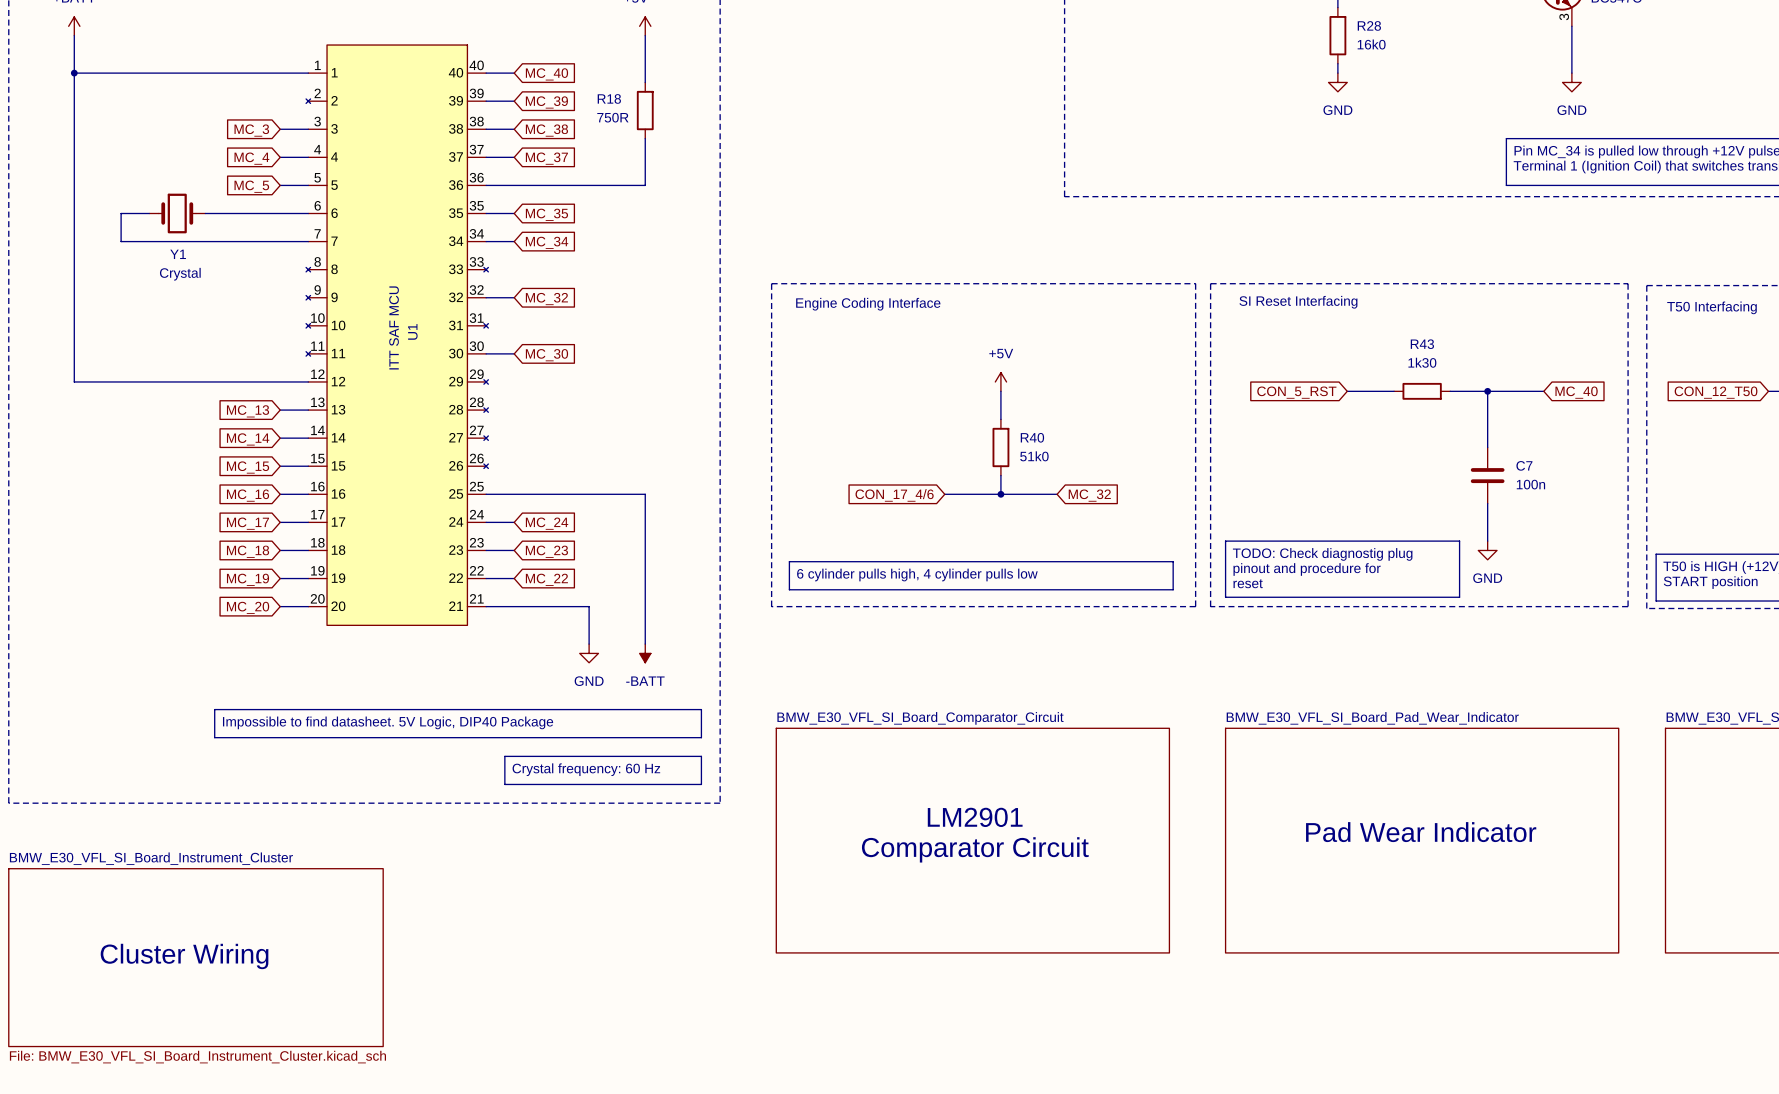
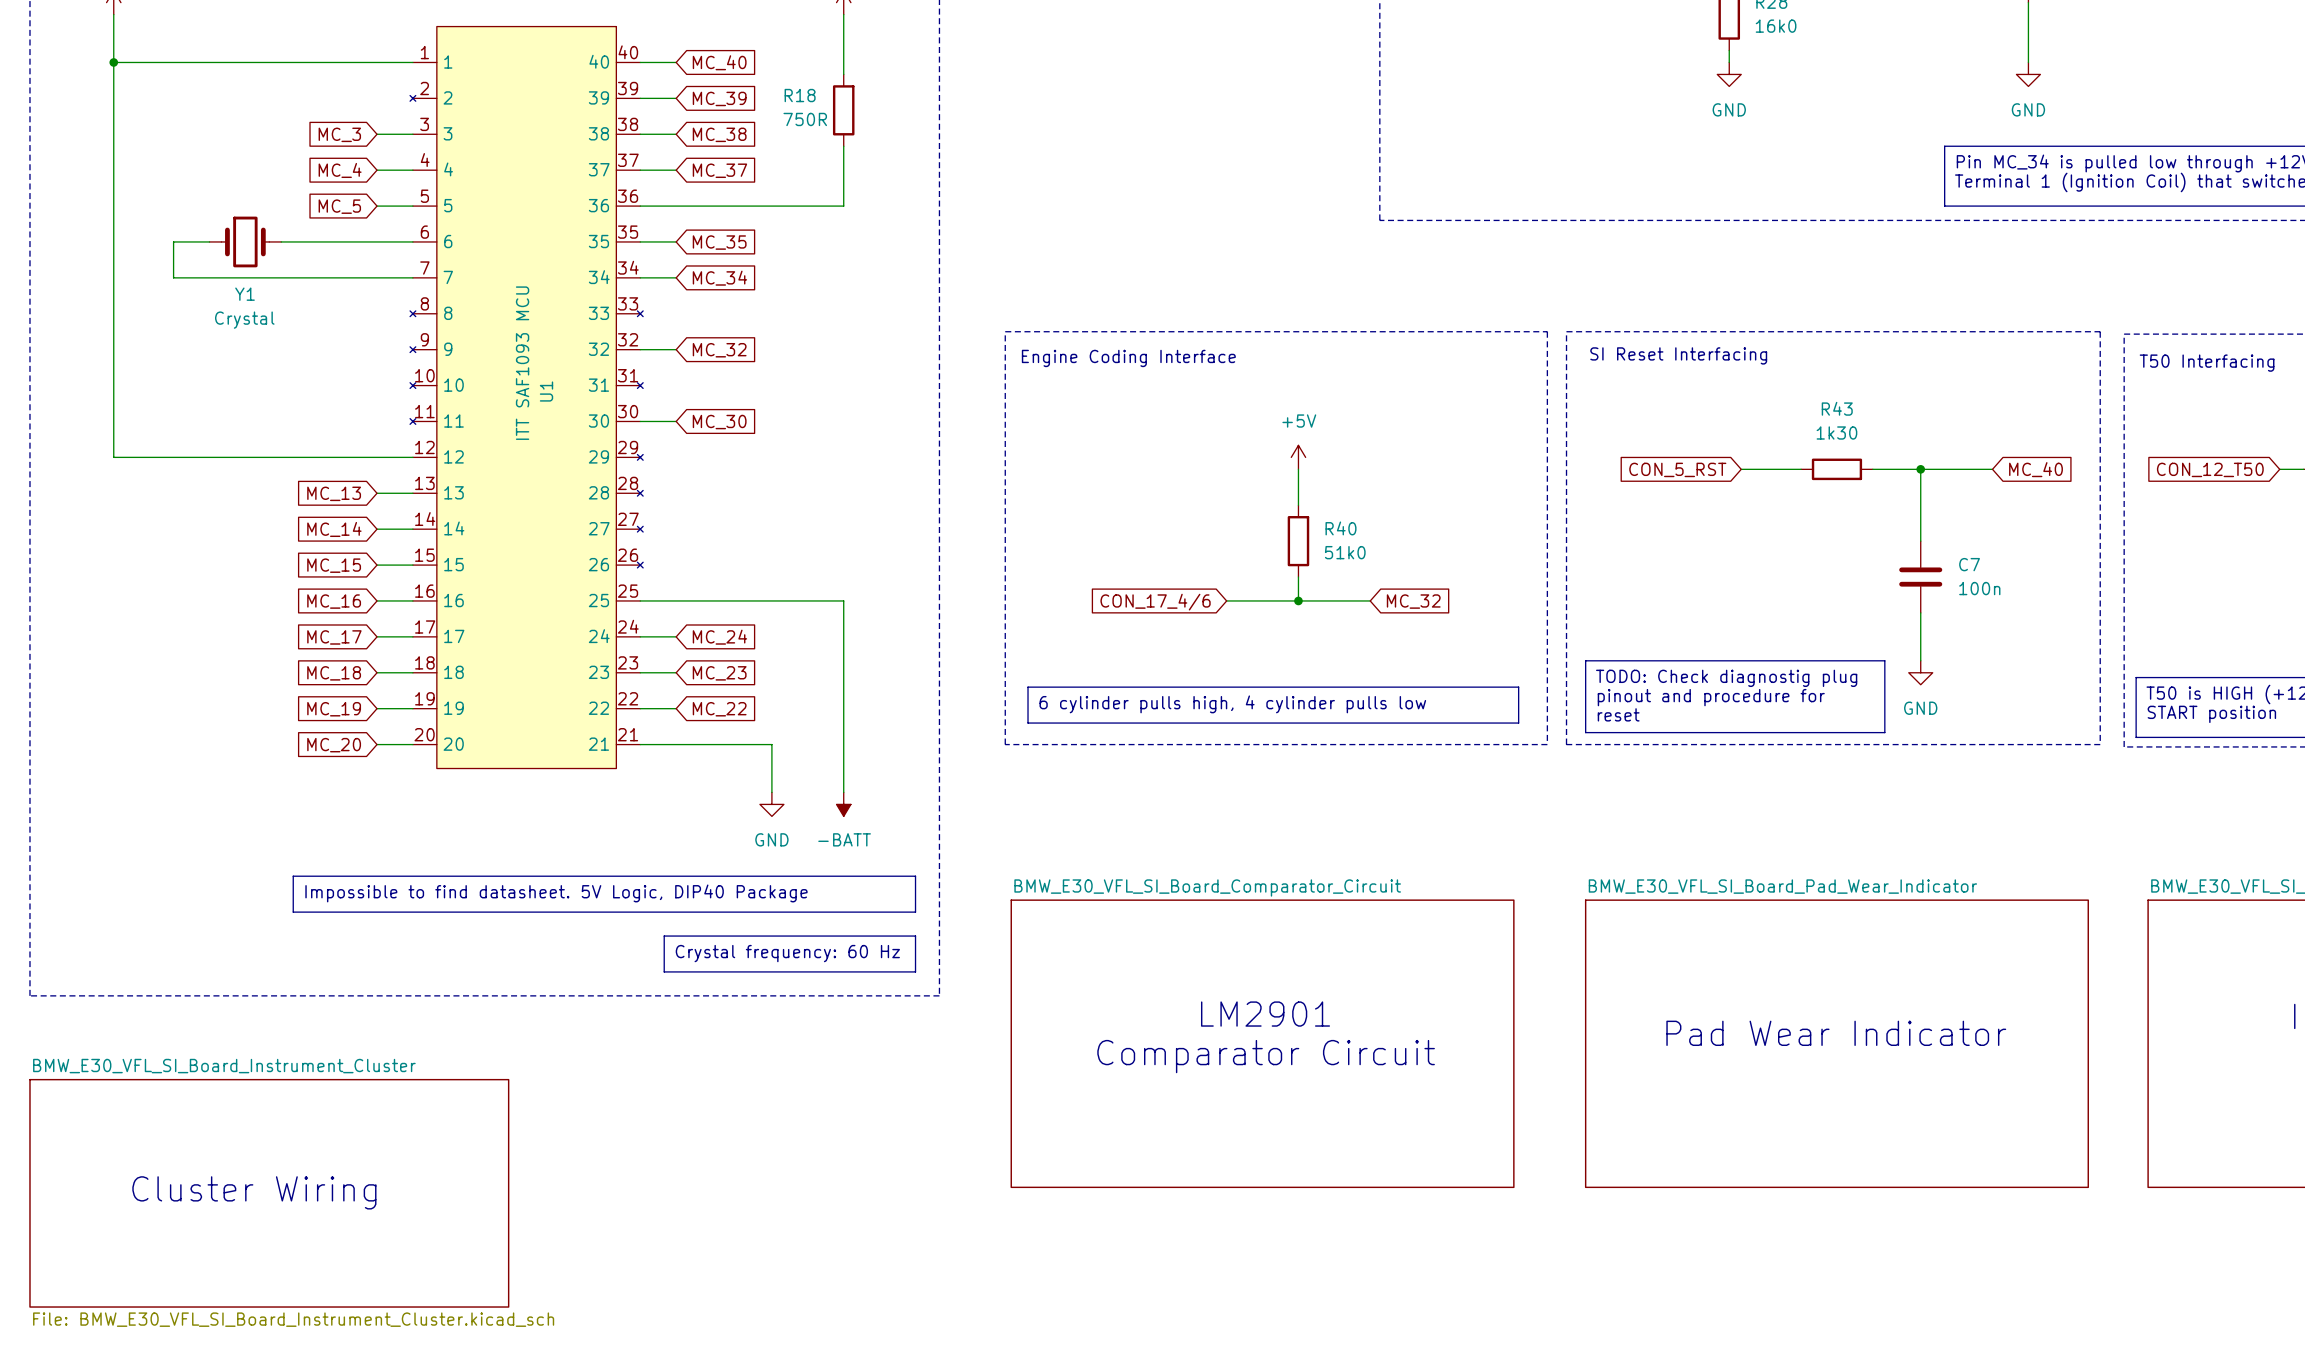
U1 value: ITT SAF MCU (394, 327) -> ITT SAF1093 MCU (522, 363)

